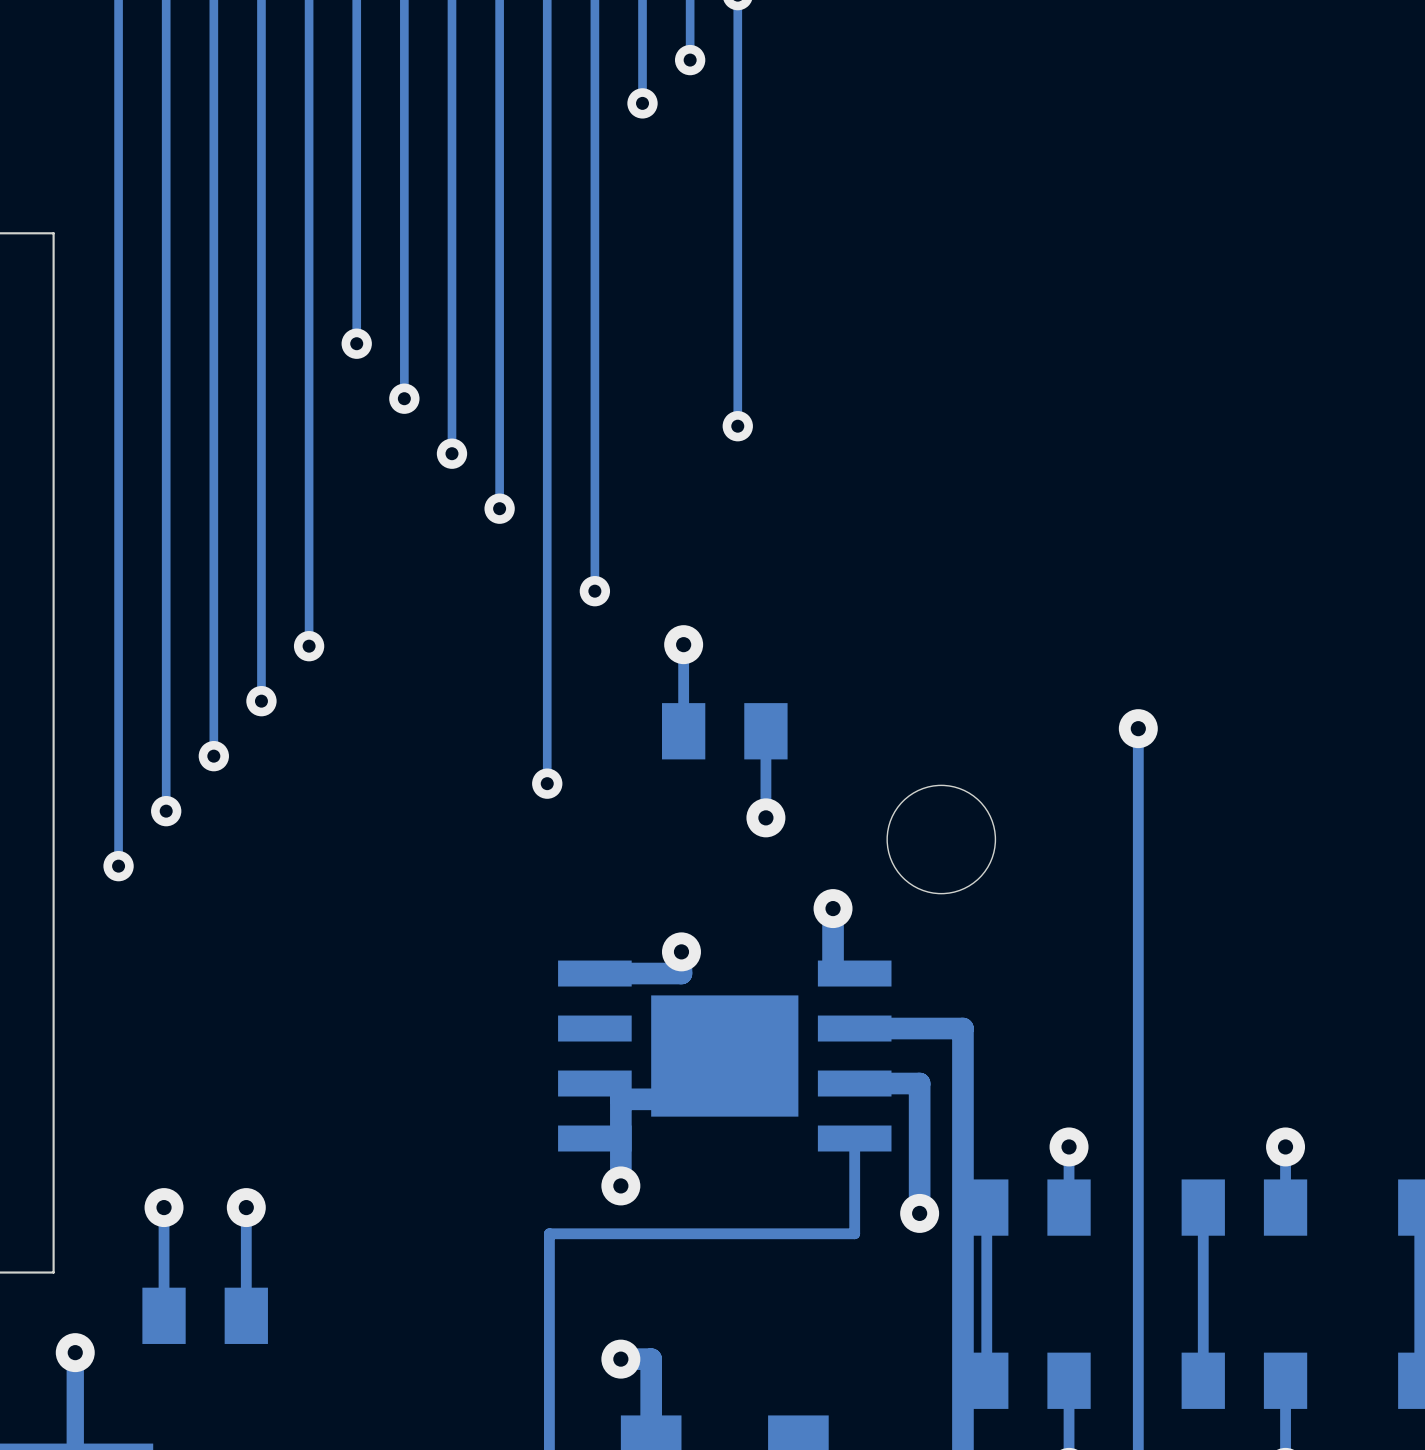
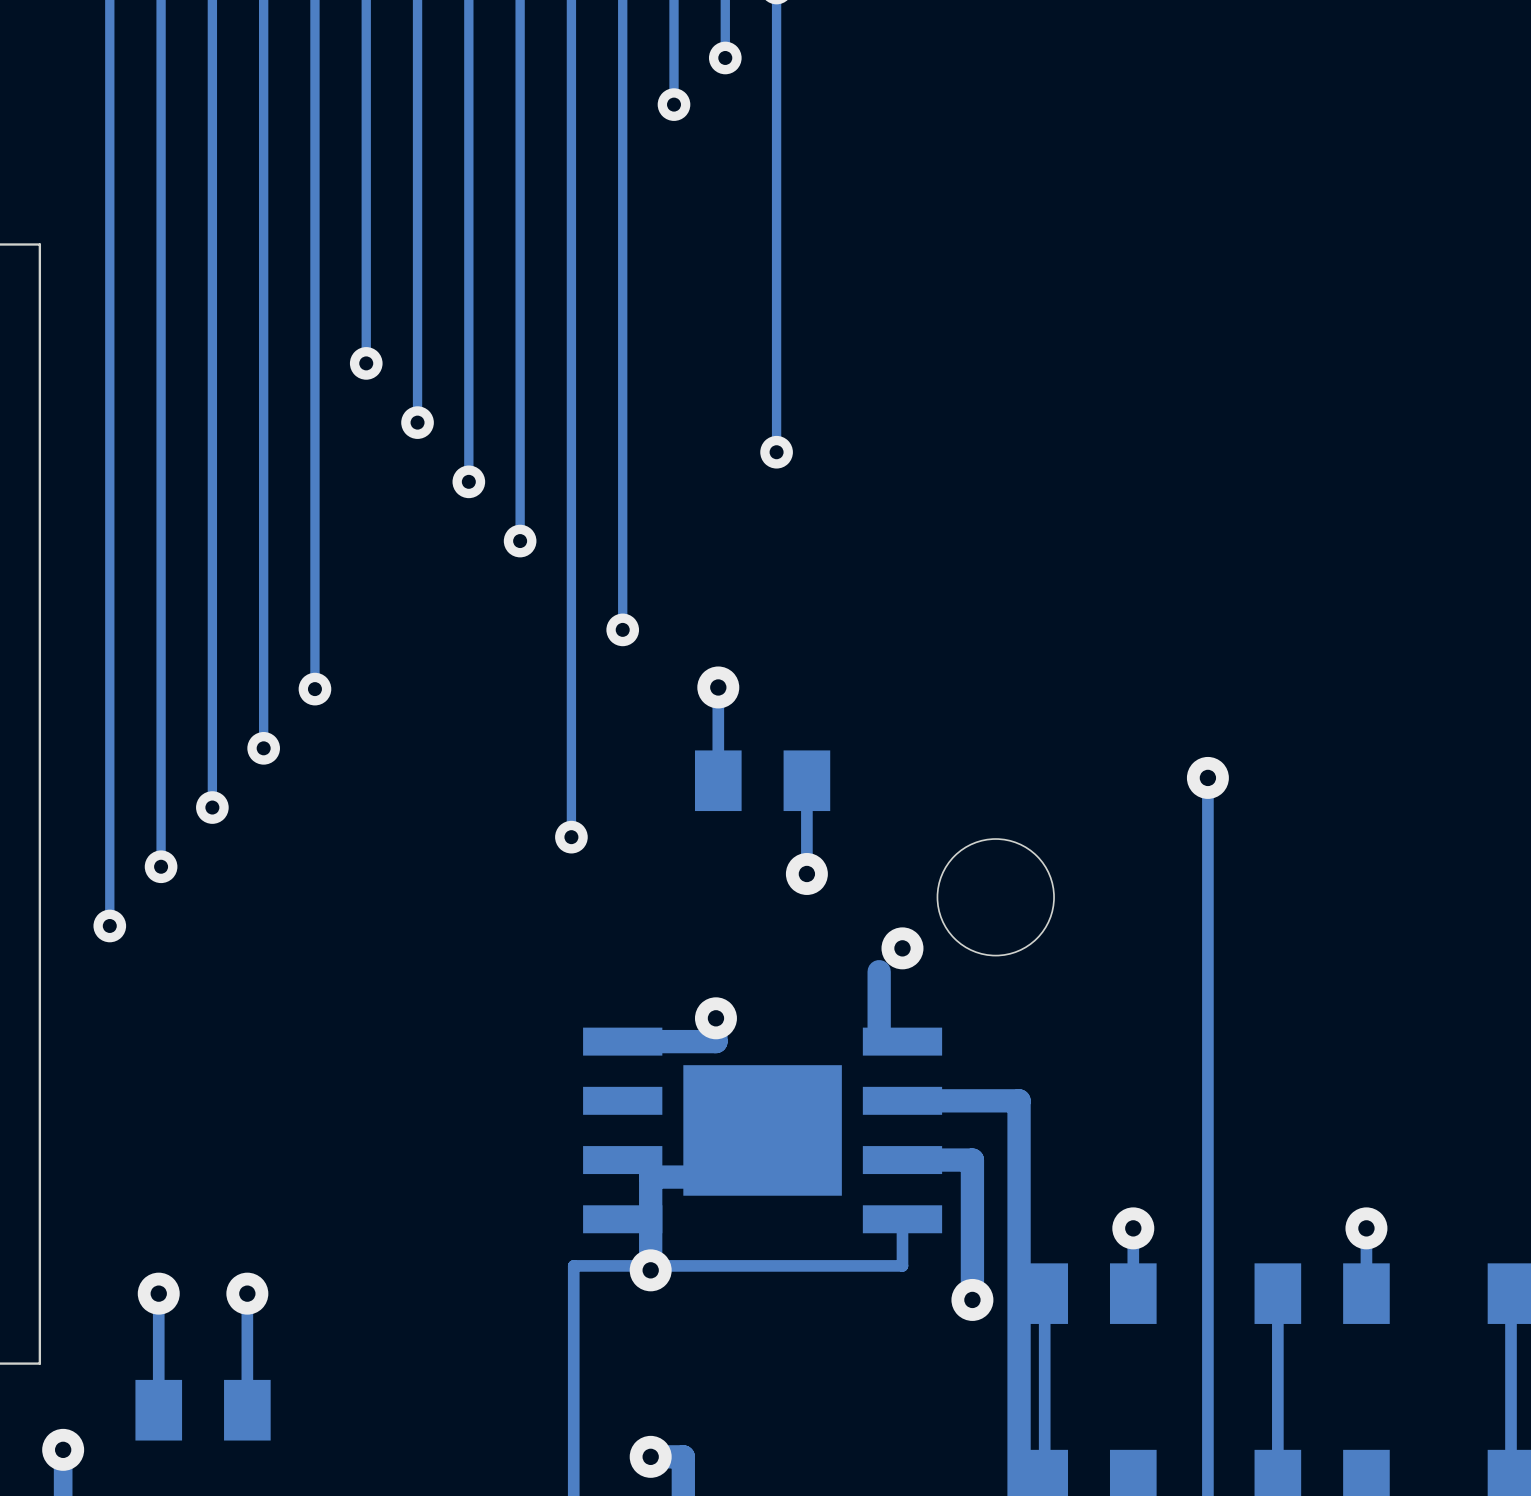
via position: (833, 908) -> (902, 948)
track: (854, 1181) (854, 1233) (549, 1233) -> (902, 1265) (573, 1265) (573, 1321)

